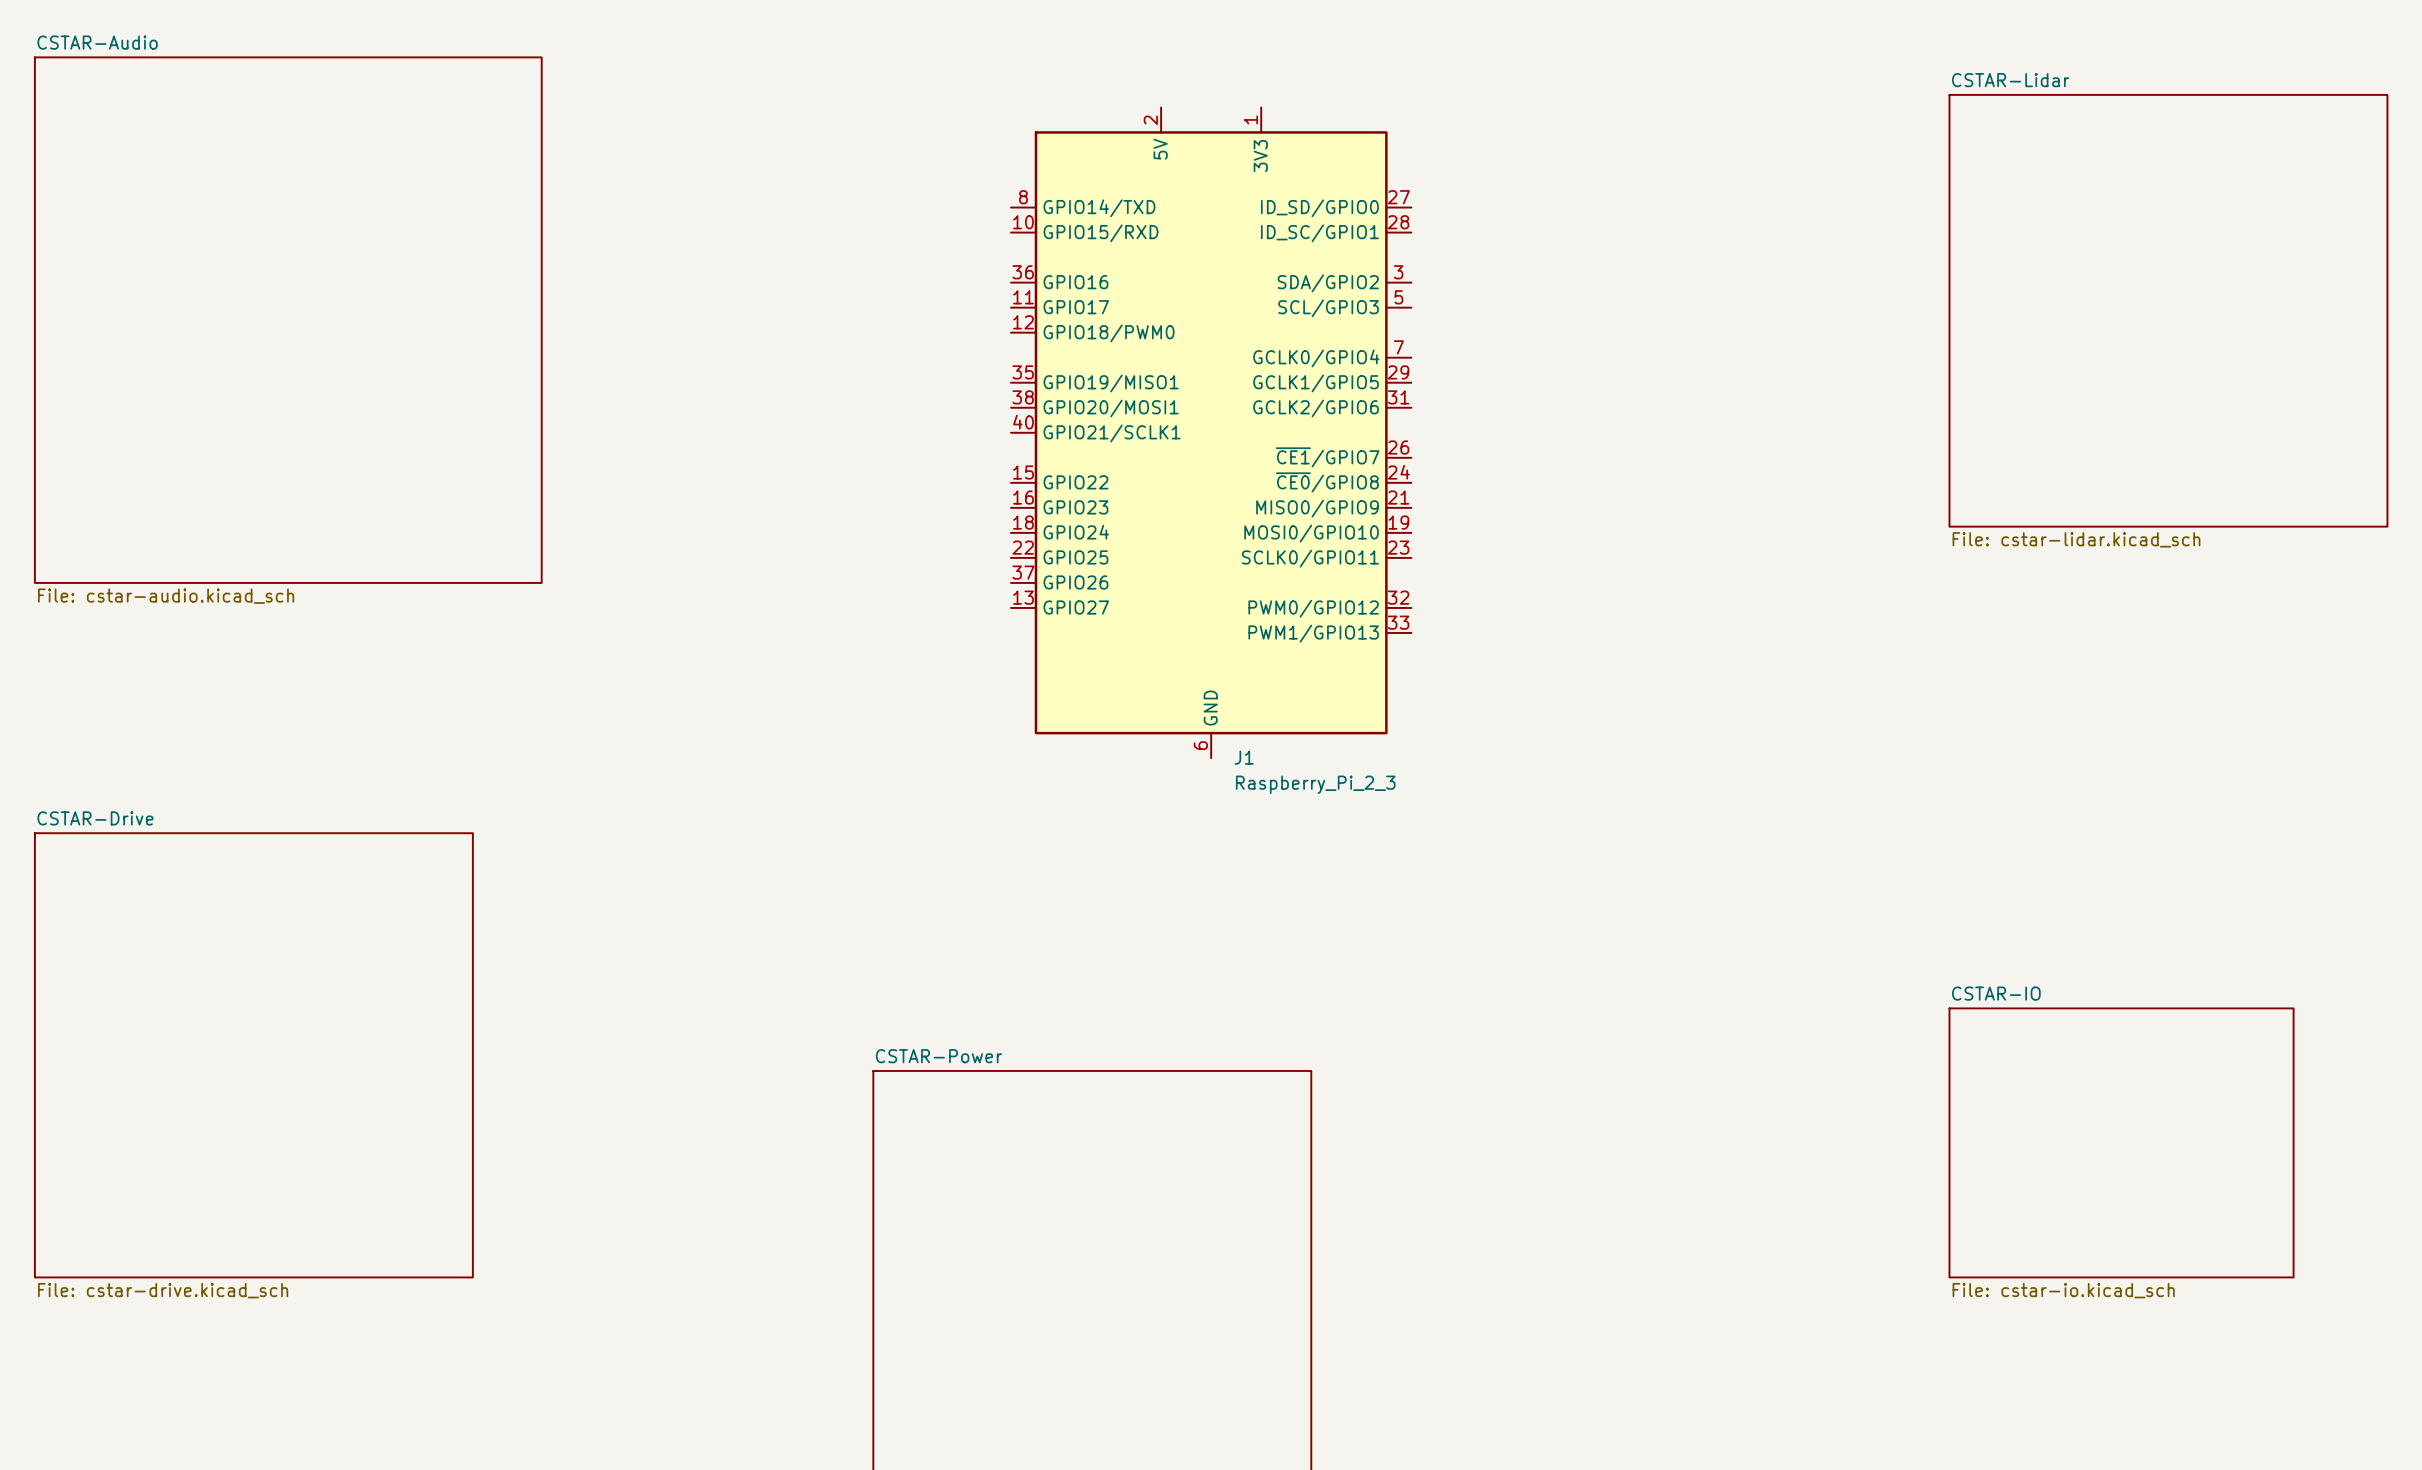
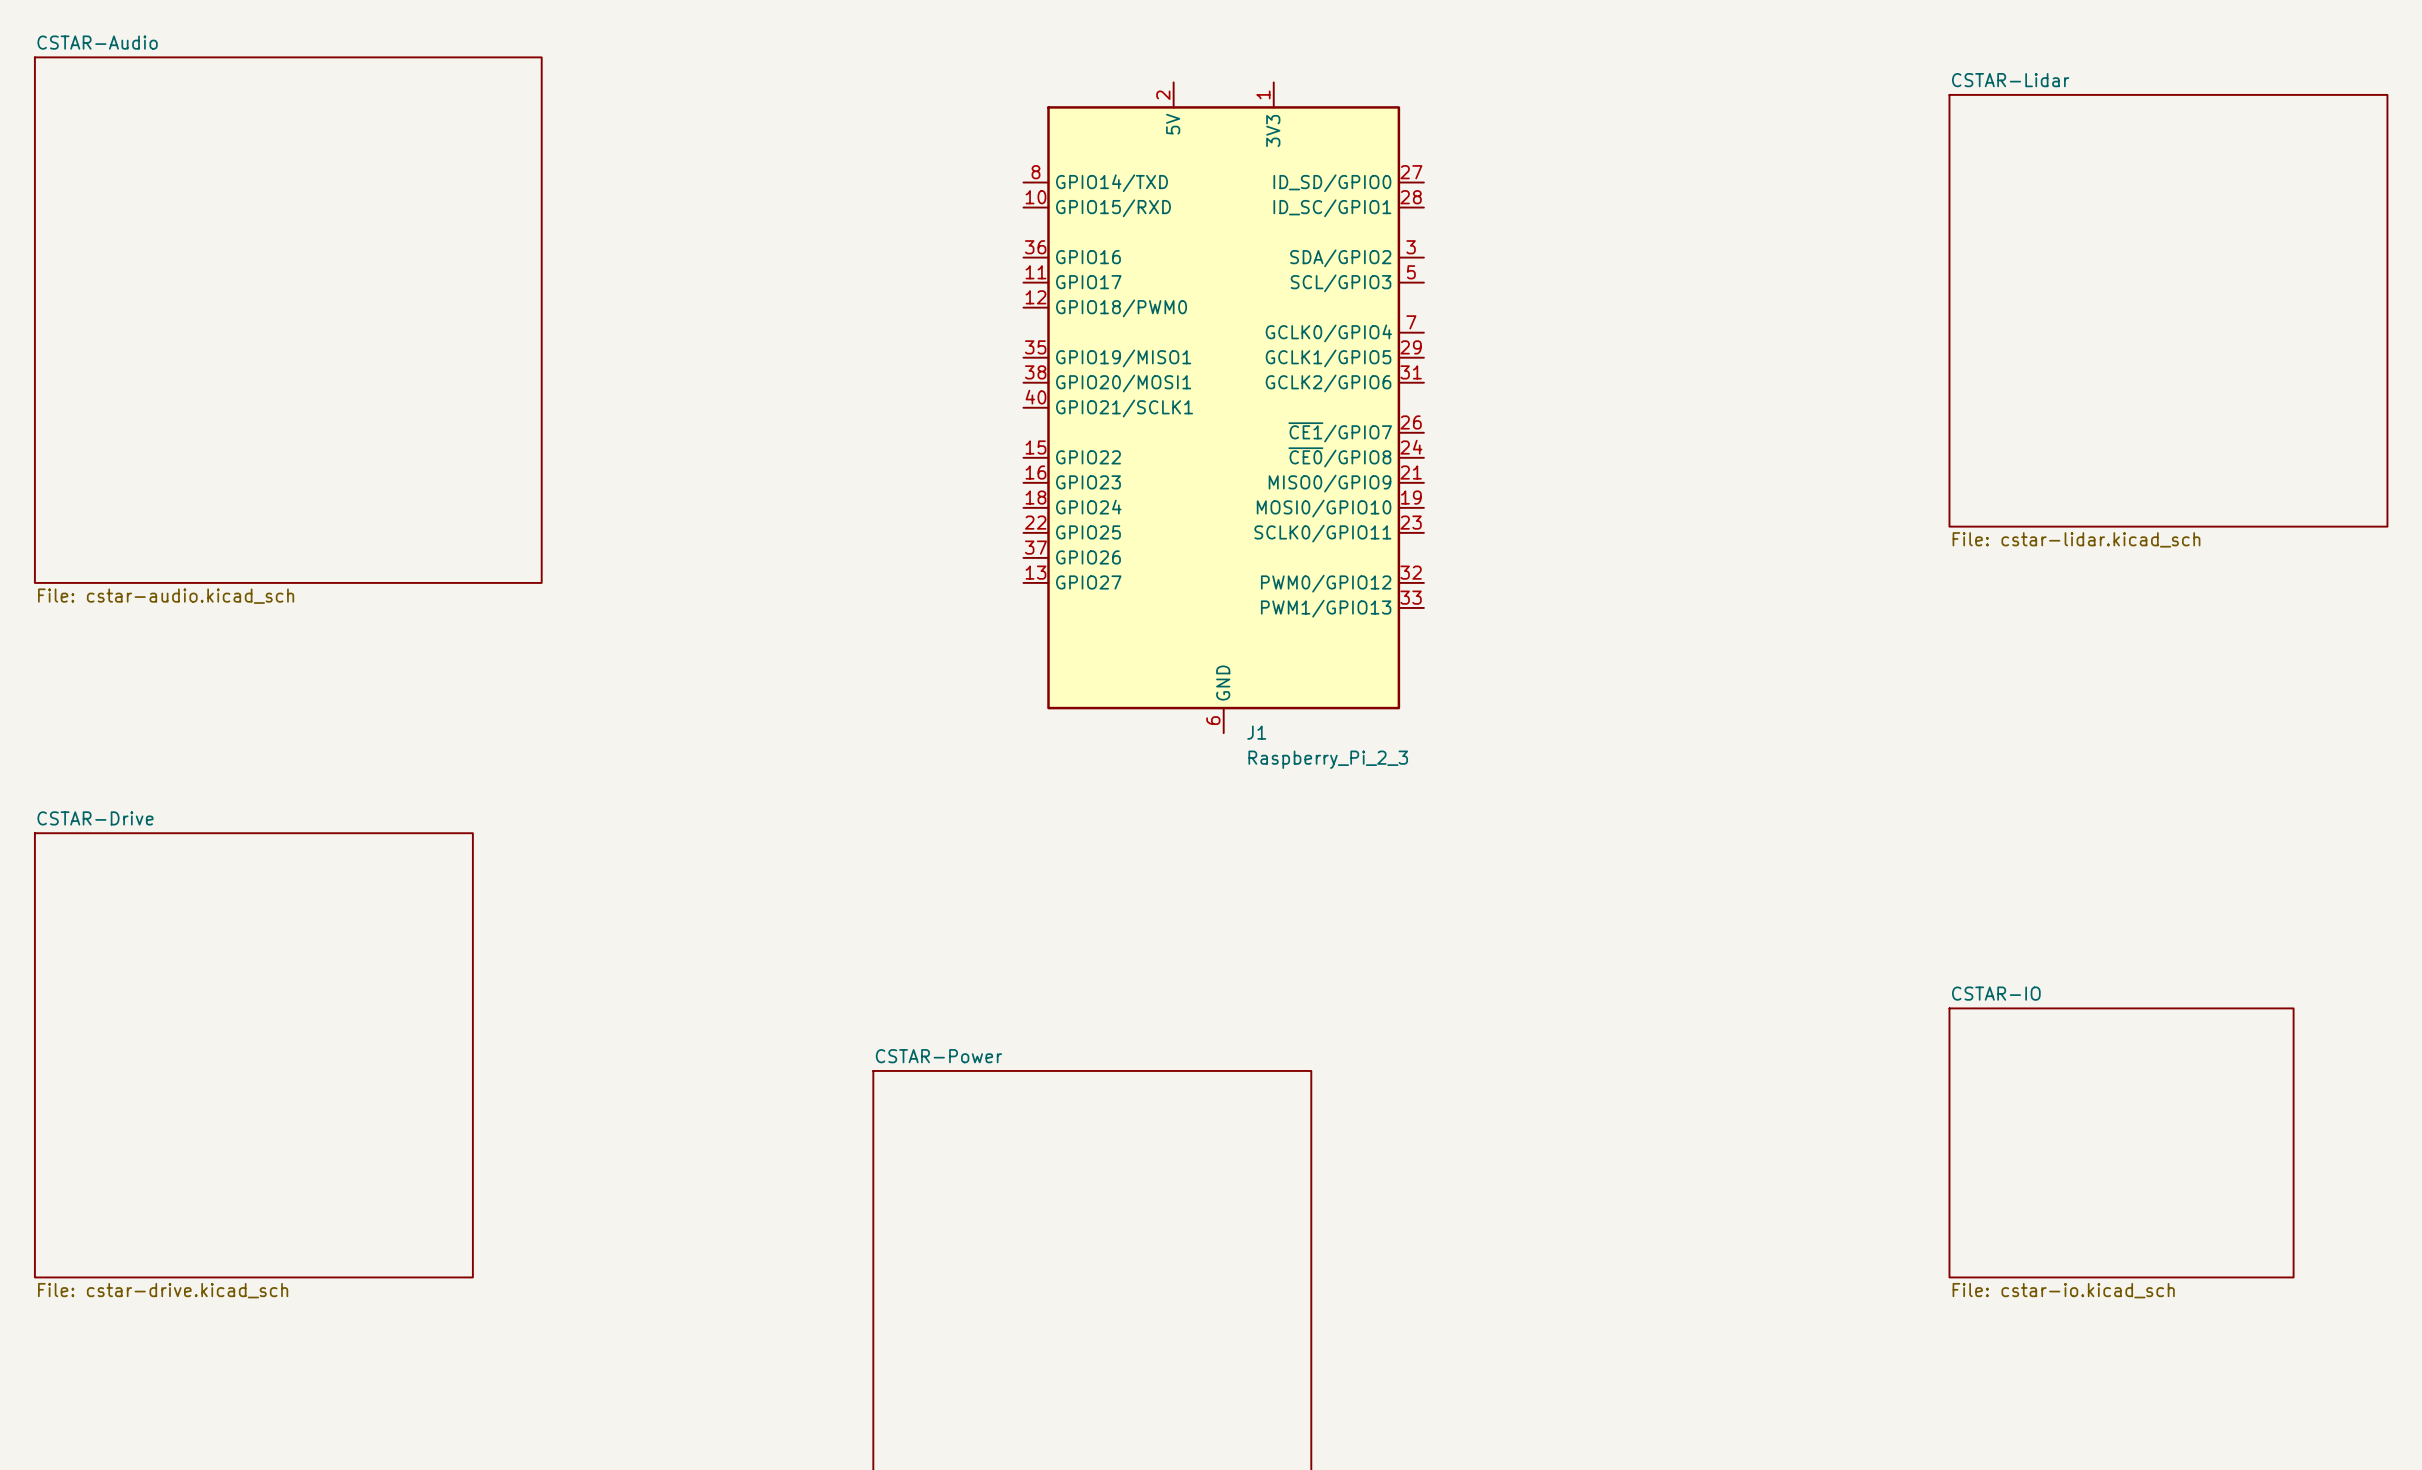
J1 position: (1211, 432) -> (1223, 407)

